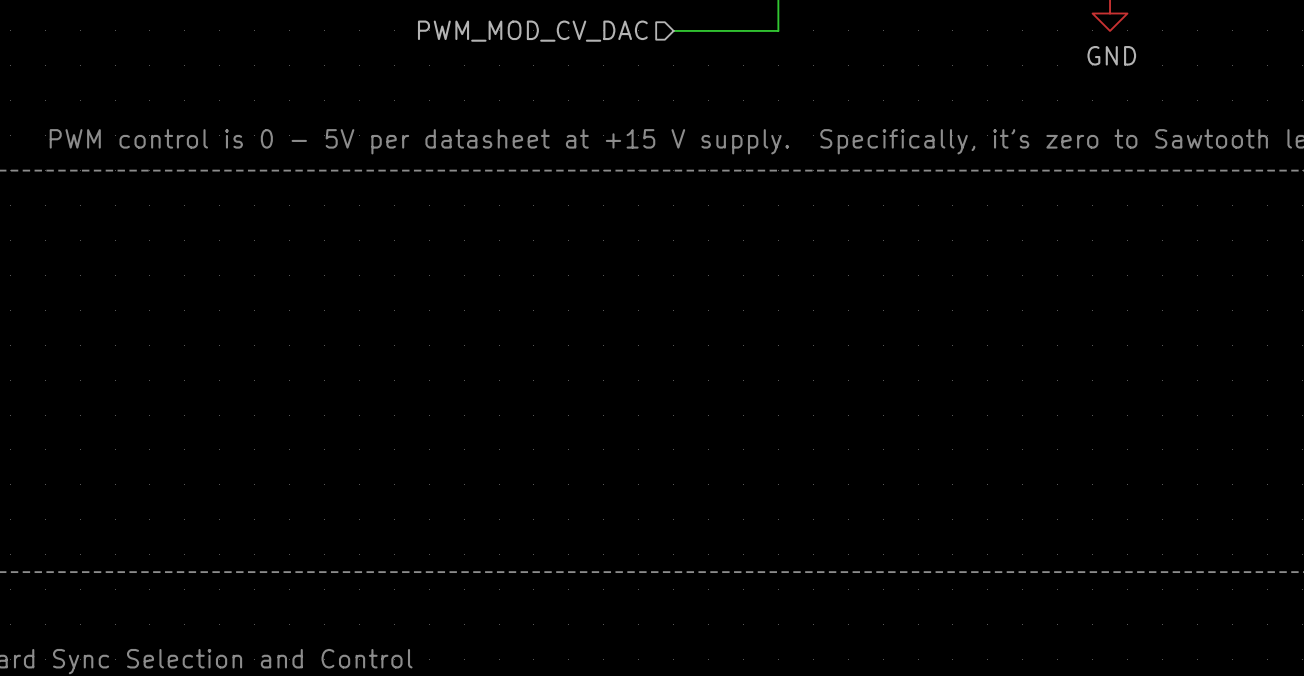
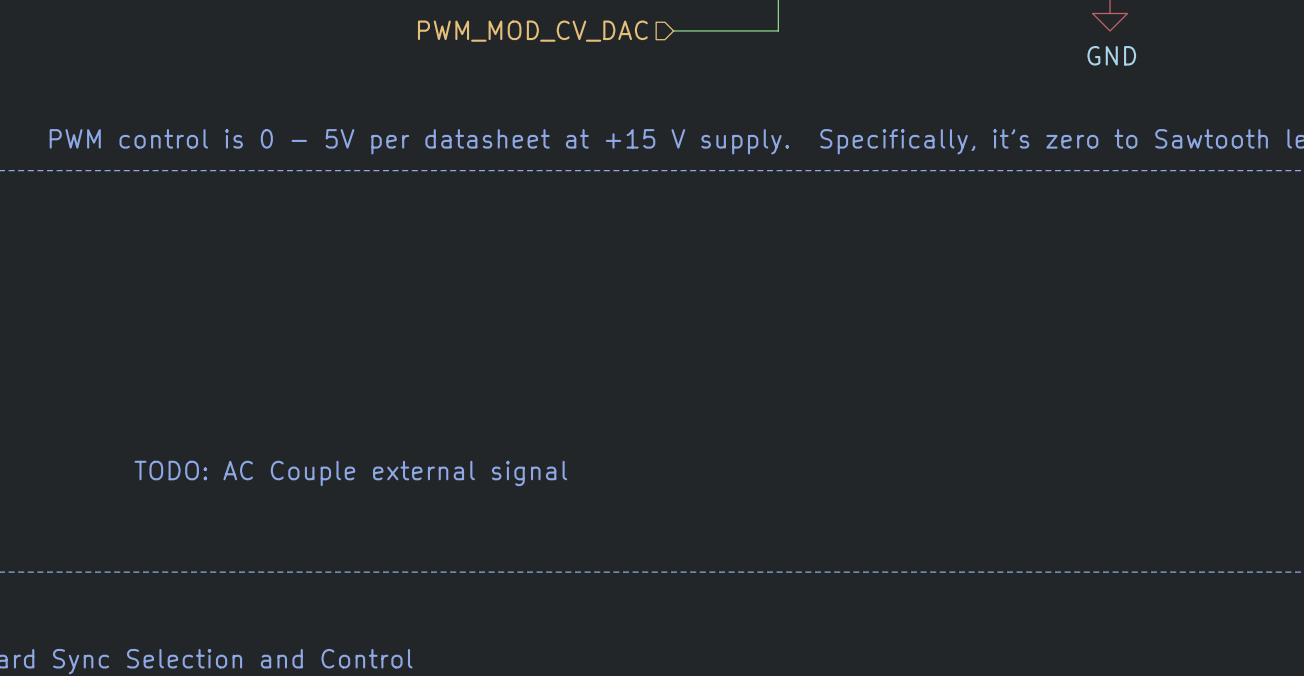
text: none -> TODO: AC Couple external signal (350, 473)

